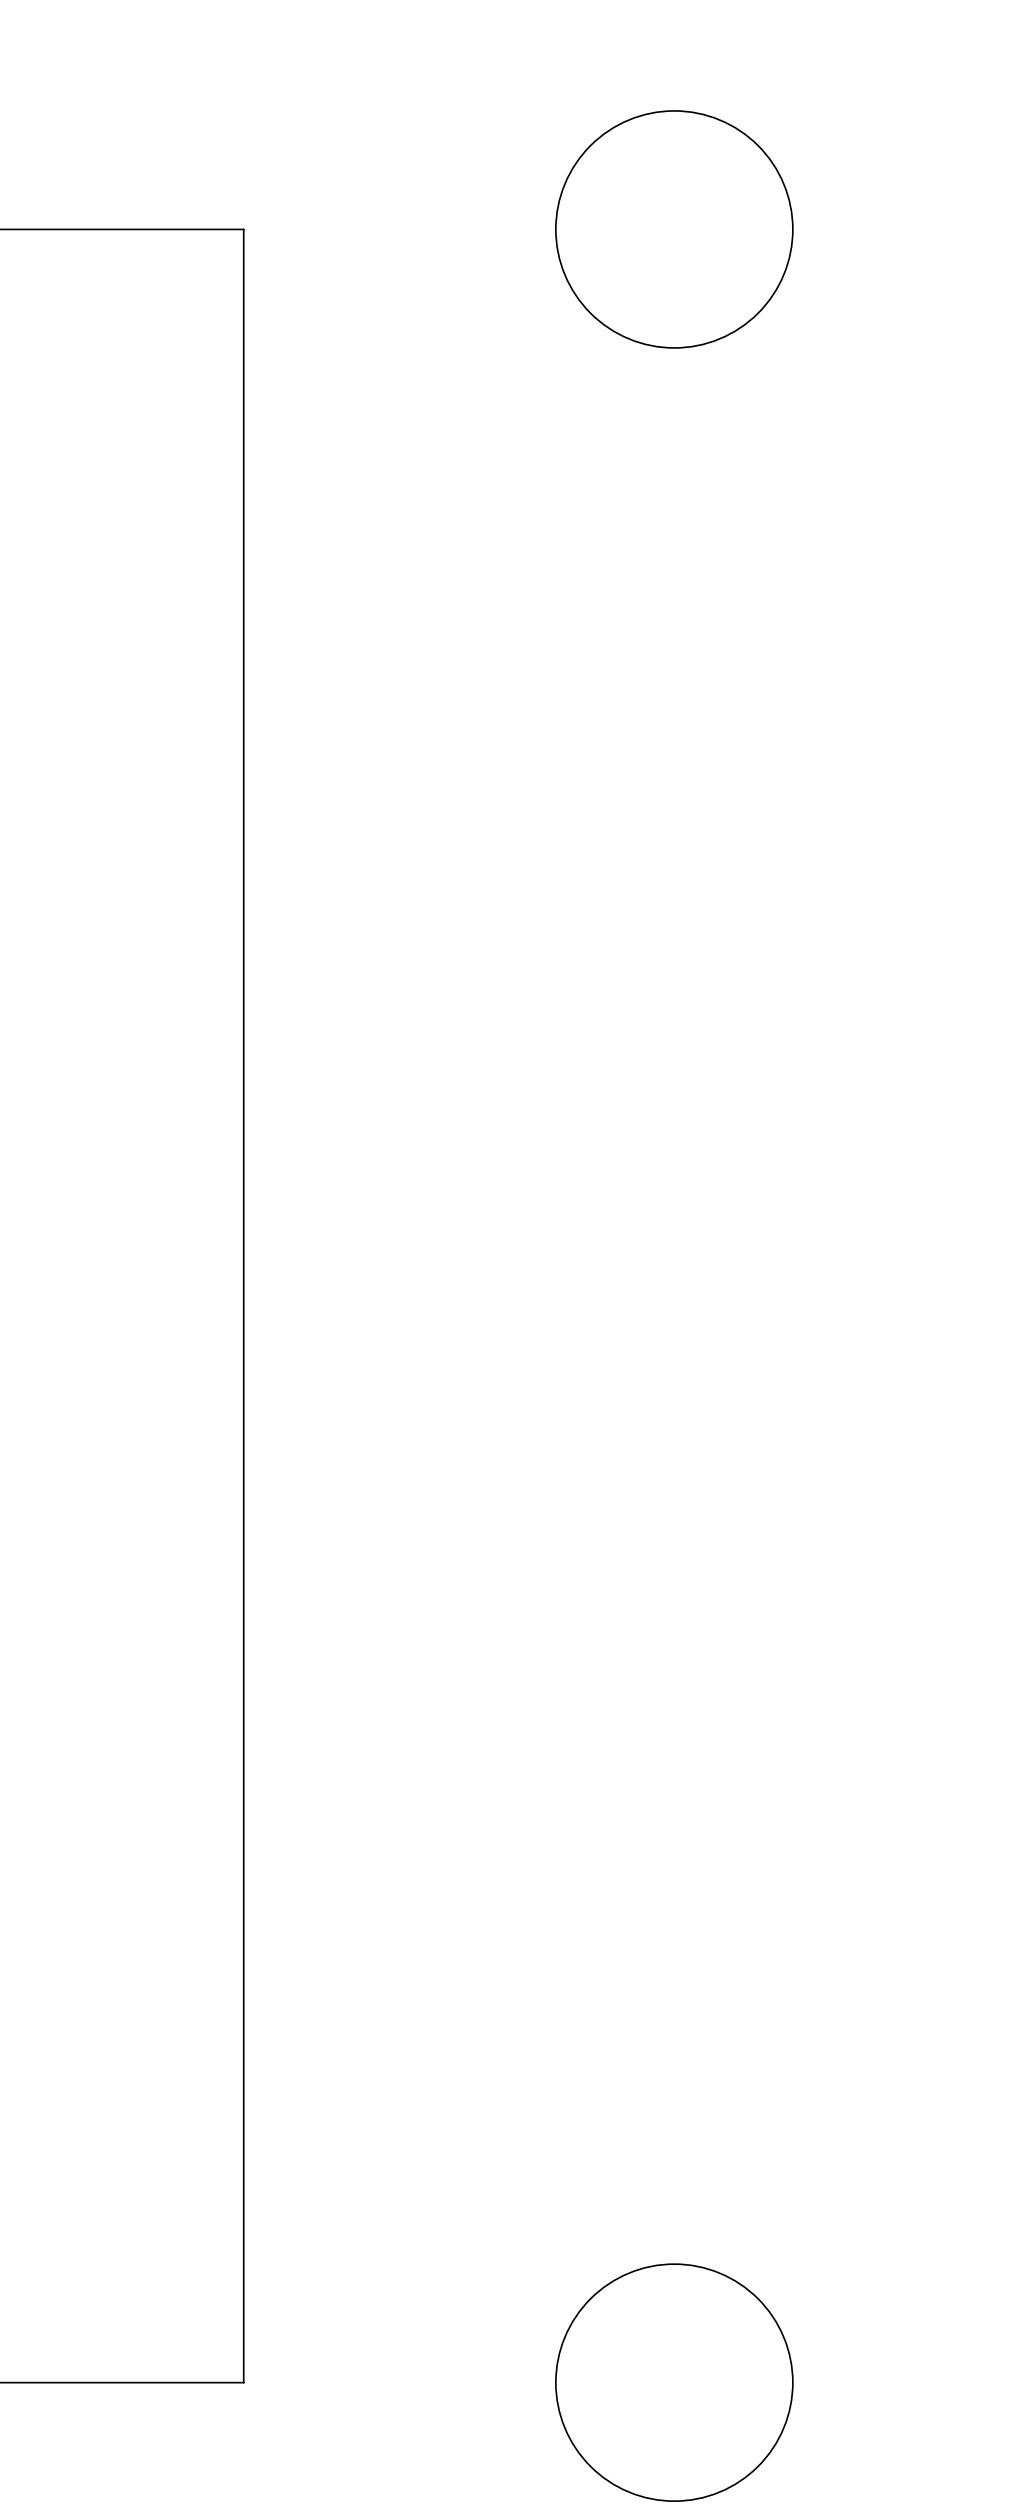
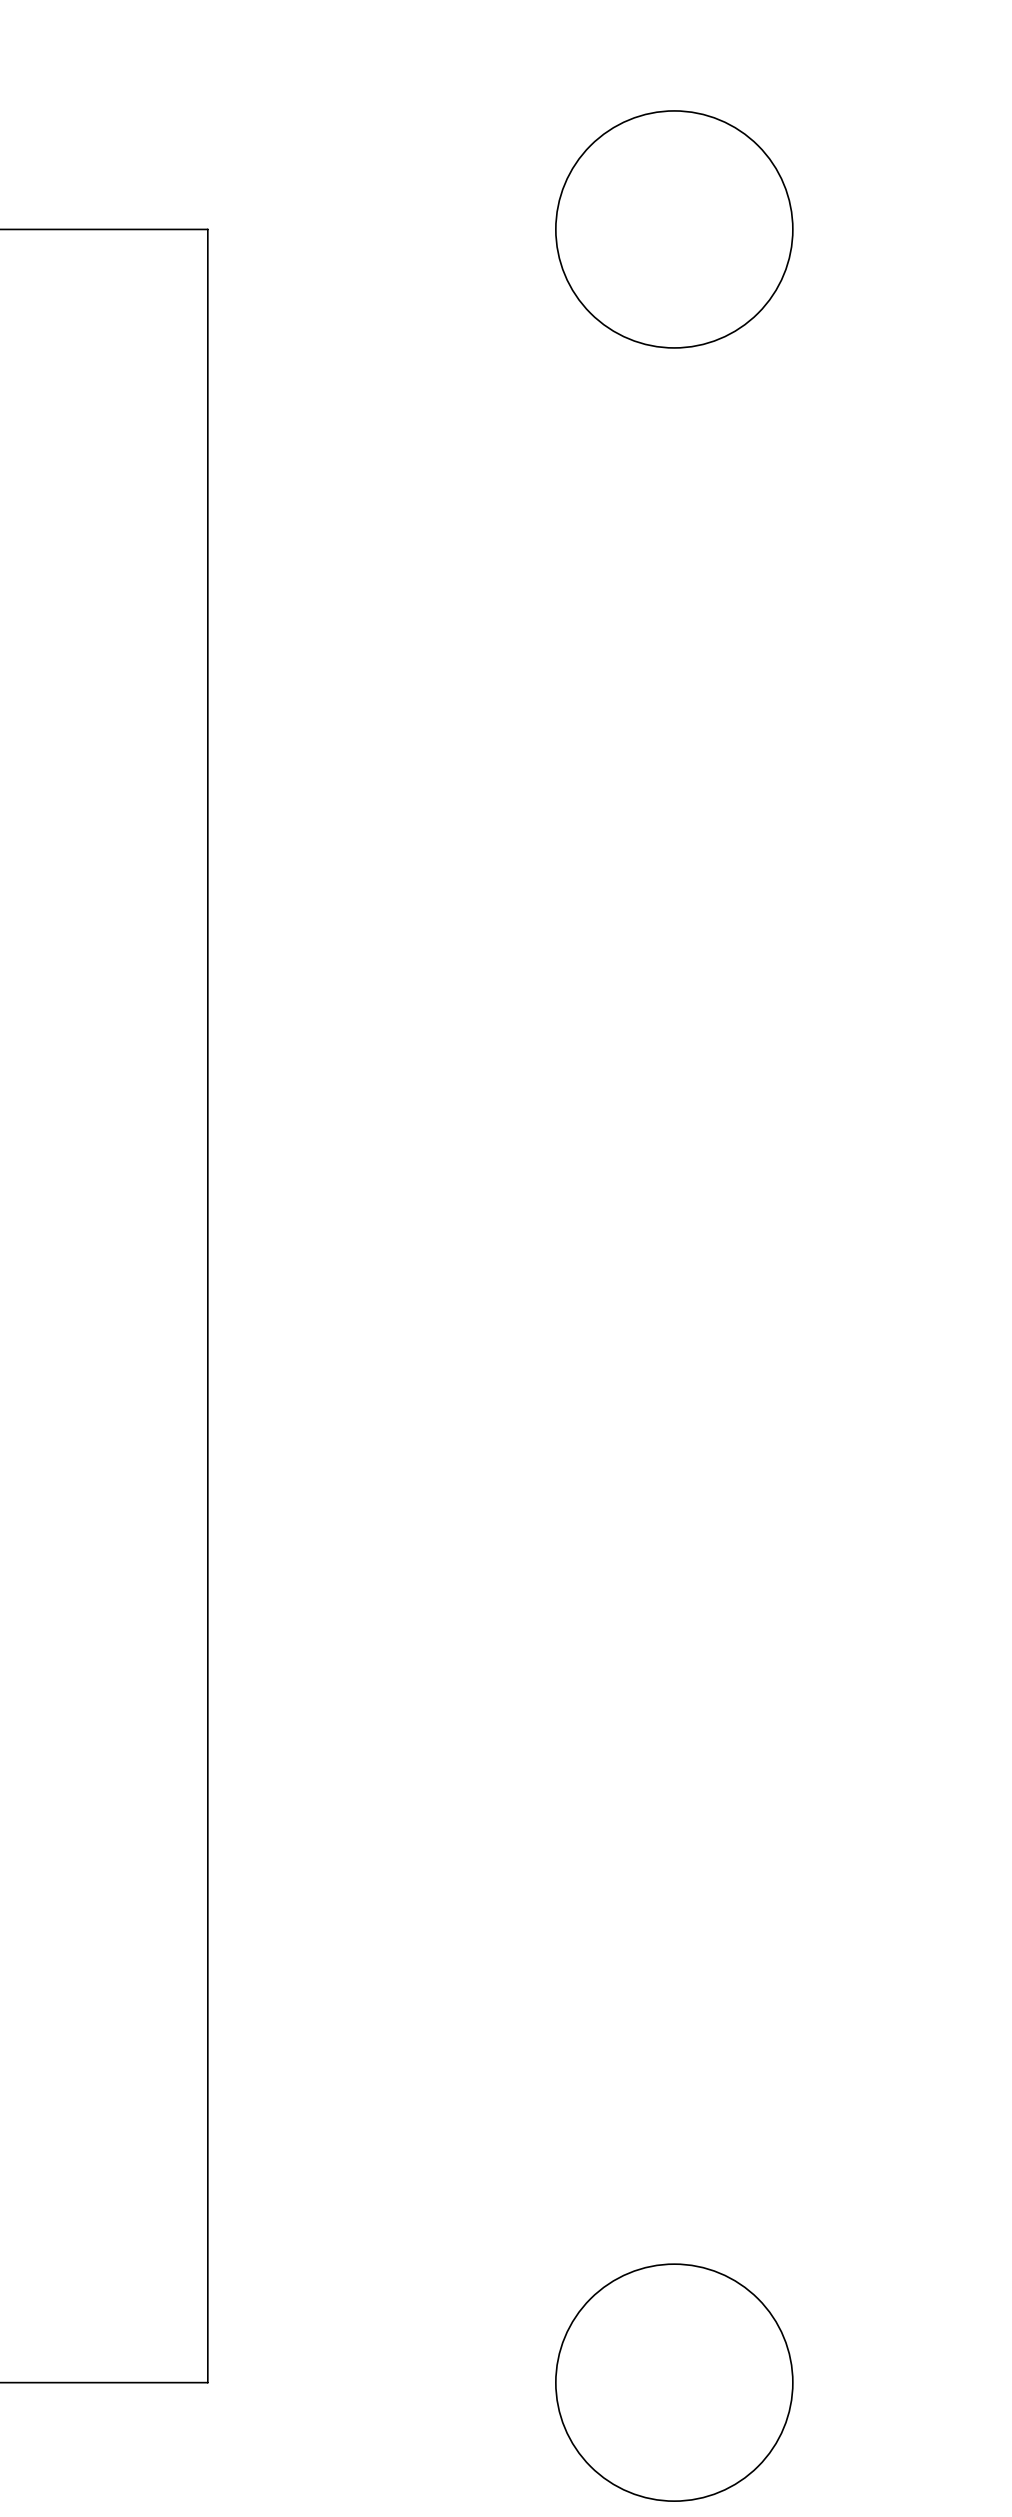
board edge: (207, 229) (243, 229) (243, 2382) (207, 2382) -> (207, 229) (207, 2382)

